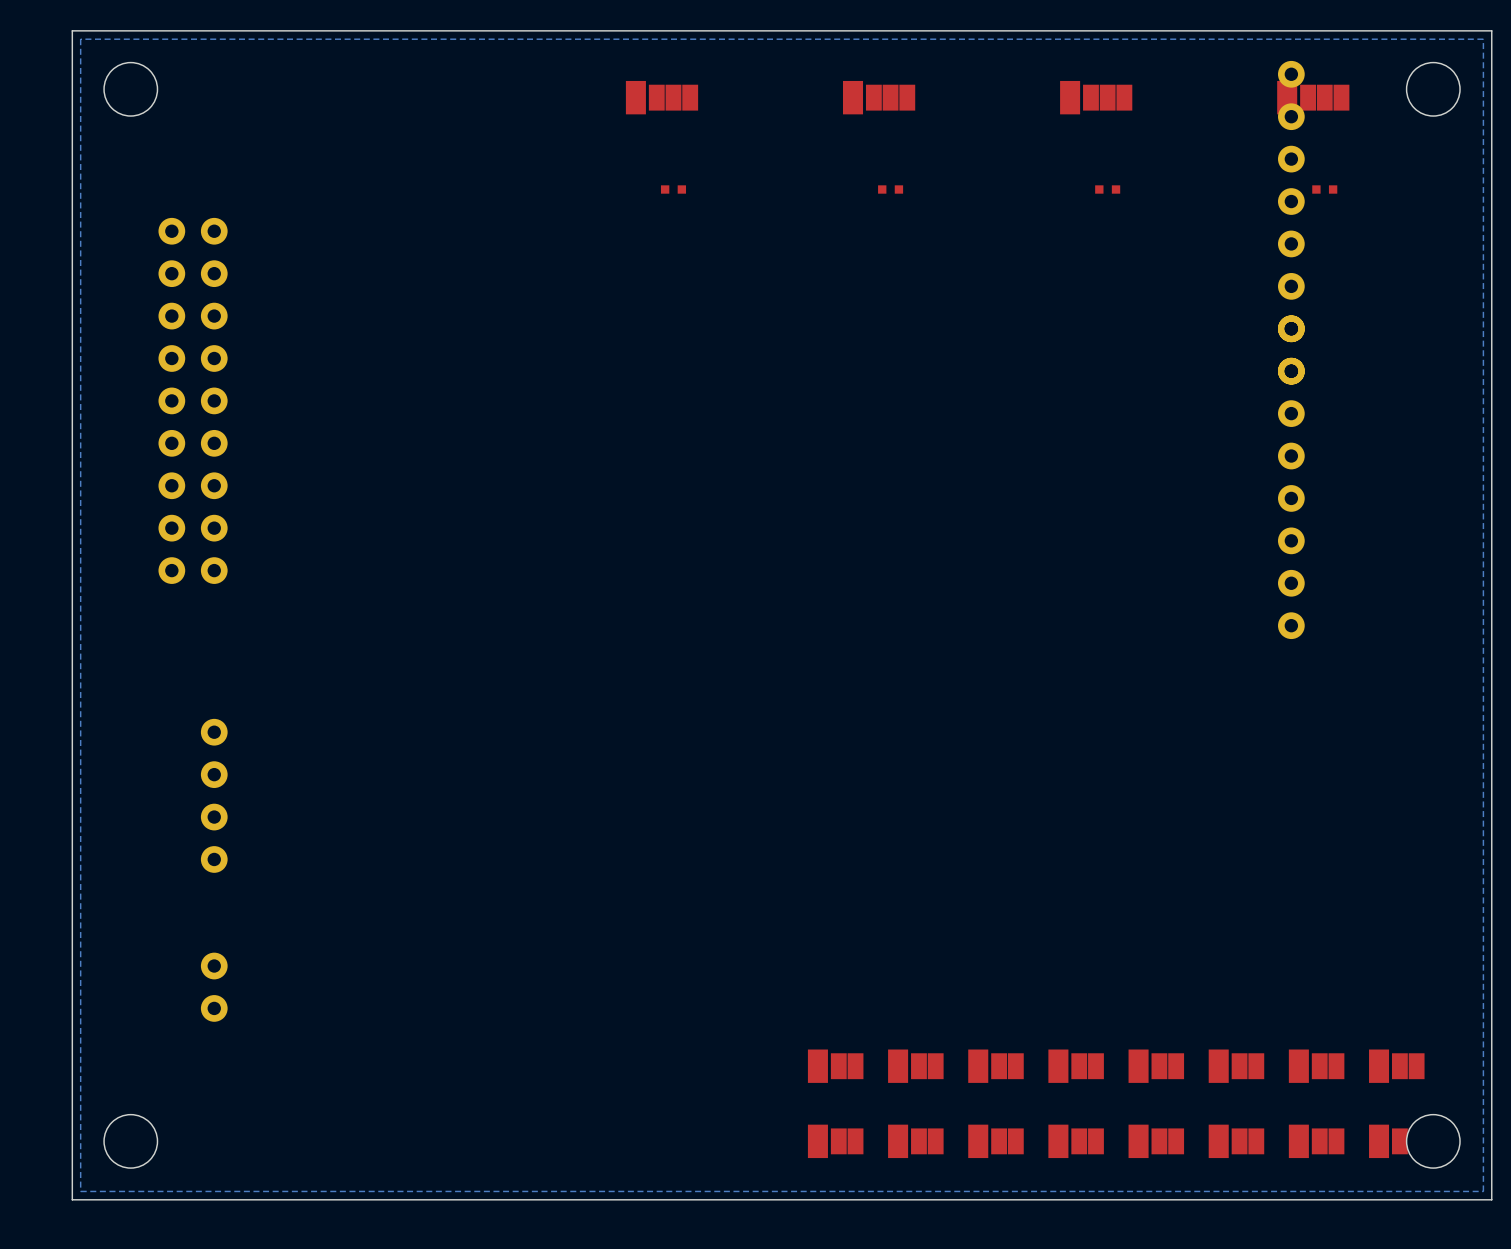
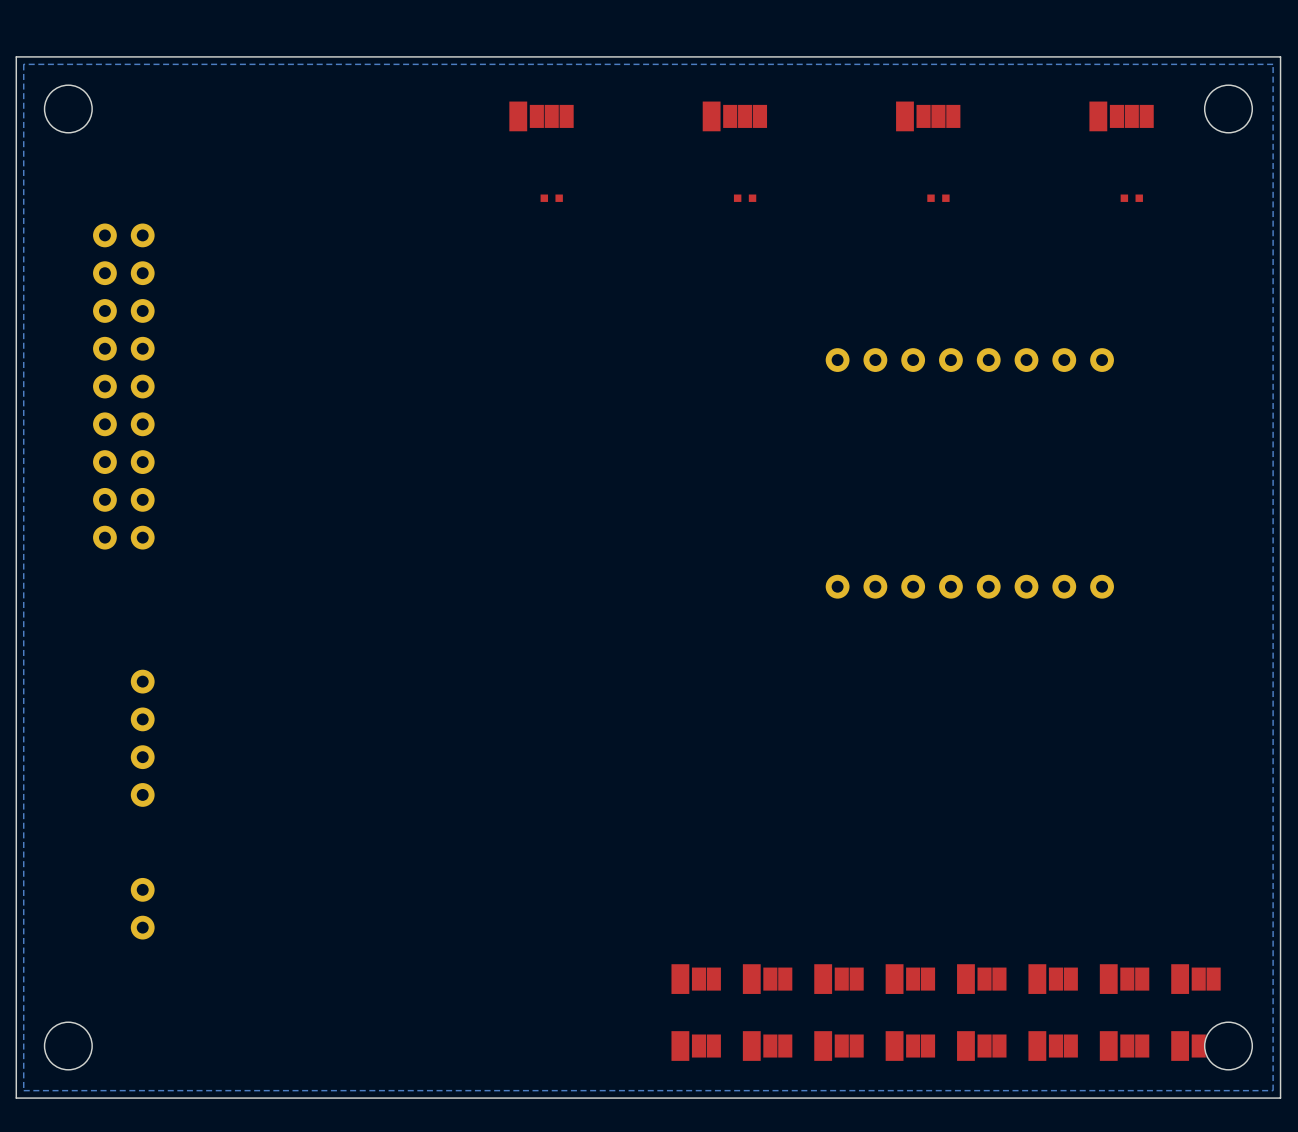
part: (1291, 222) -> none
part: none -> (969, 360)
part: (1291, 477) -> none
part: none -> (969, 586)

